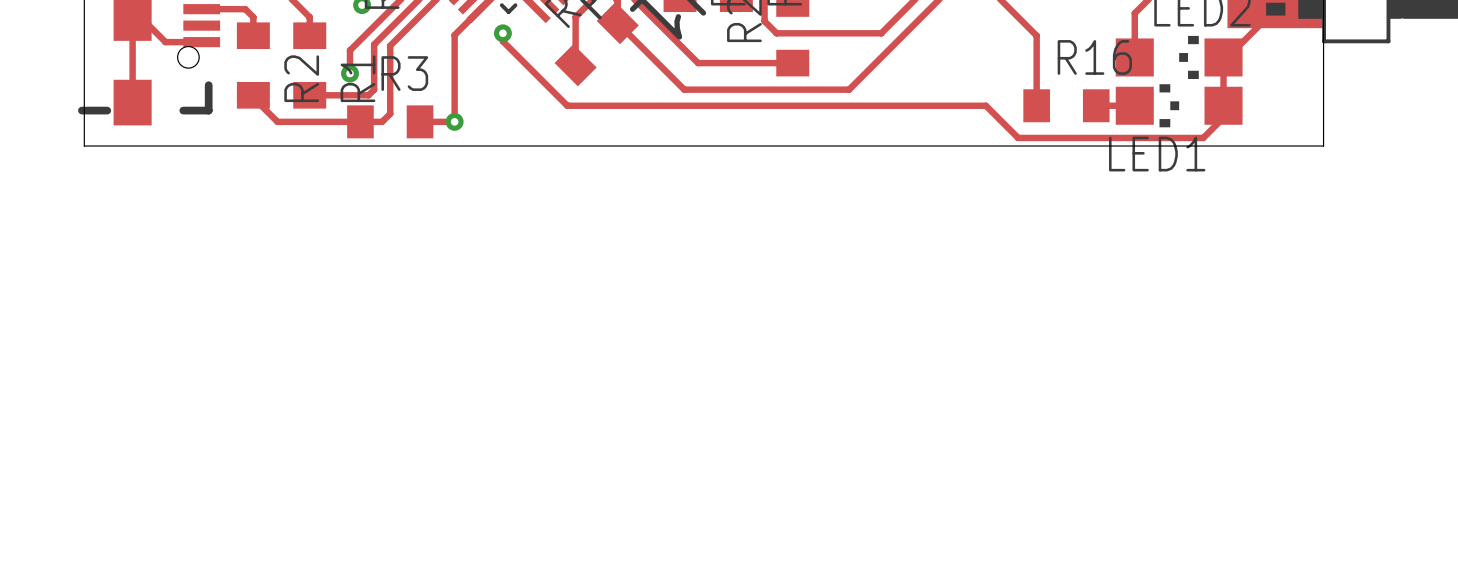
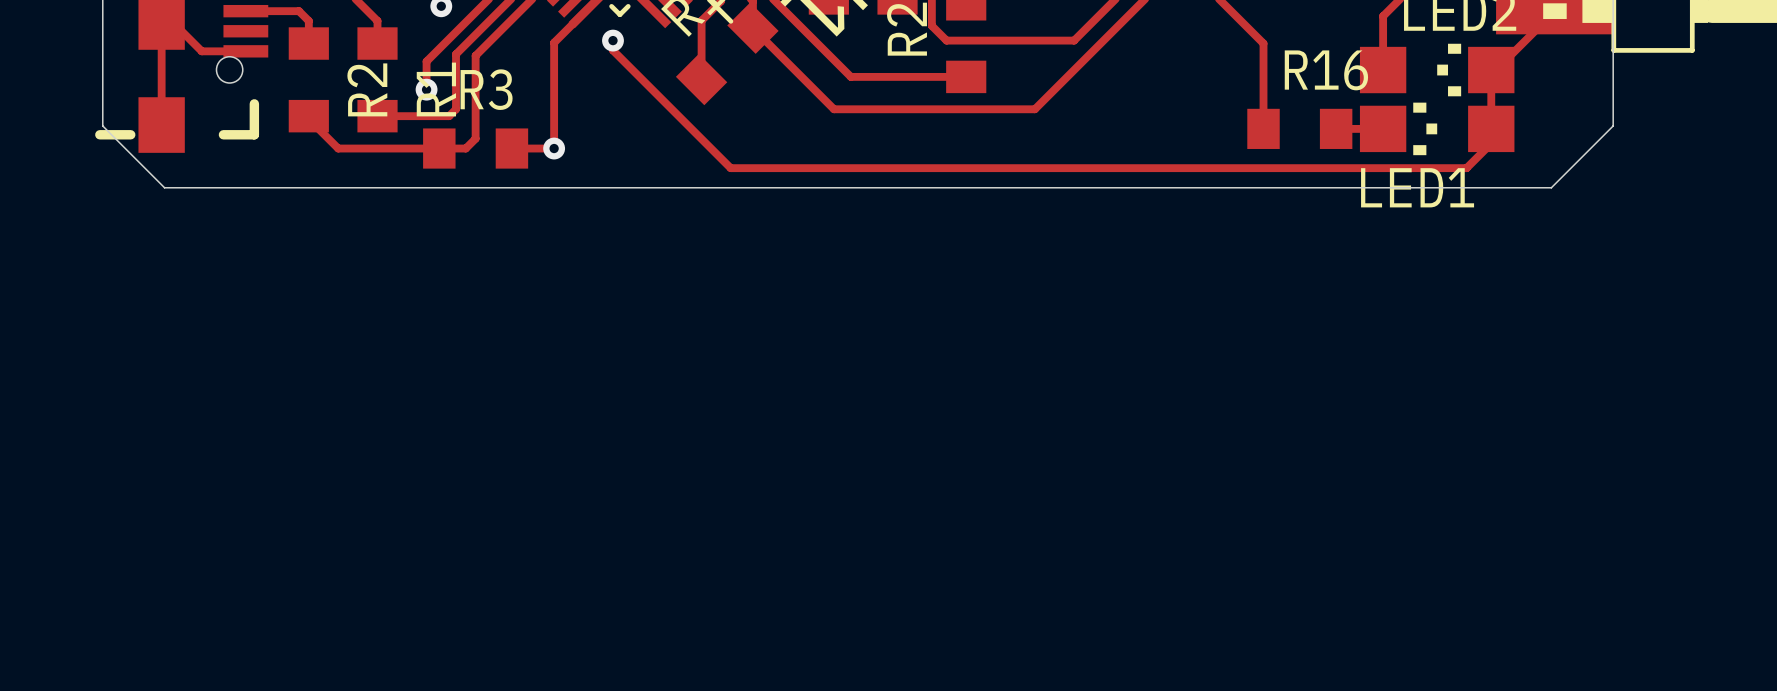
board edge: (84, 103) (84, 146) (1323, 146) (1323, 103) -> (102, 125) (164, 187) (1551, 187) (1613, 125)
track: (567, 105) (985, 105) (1018, 137) -> (691, 128) (730, 168) (1240, 168)

